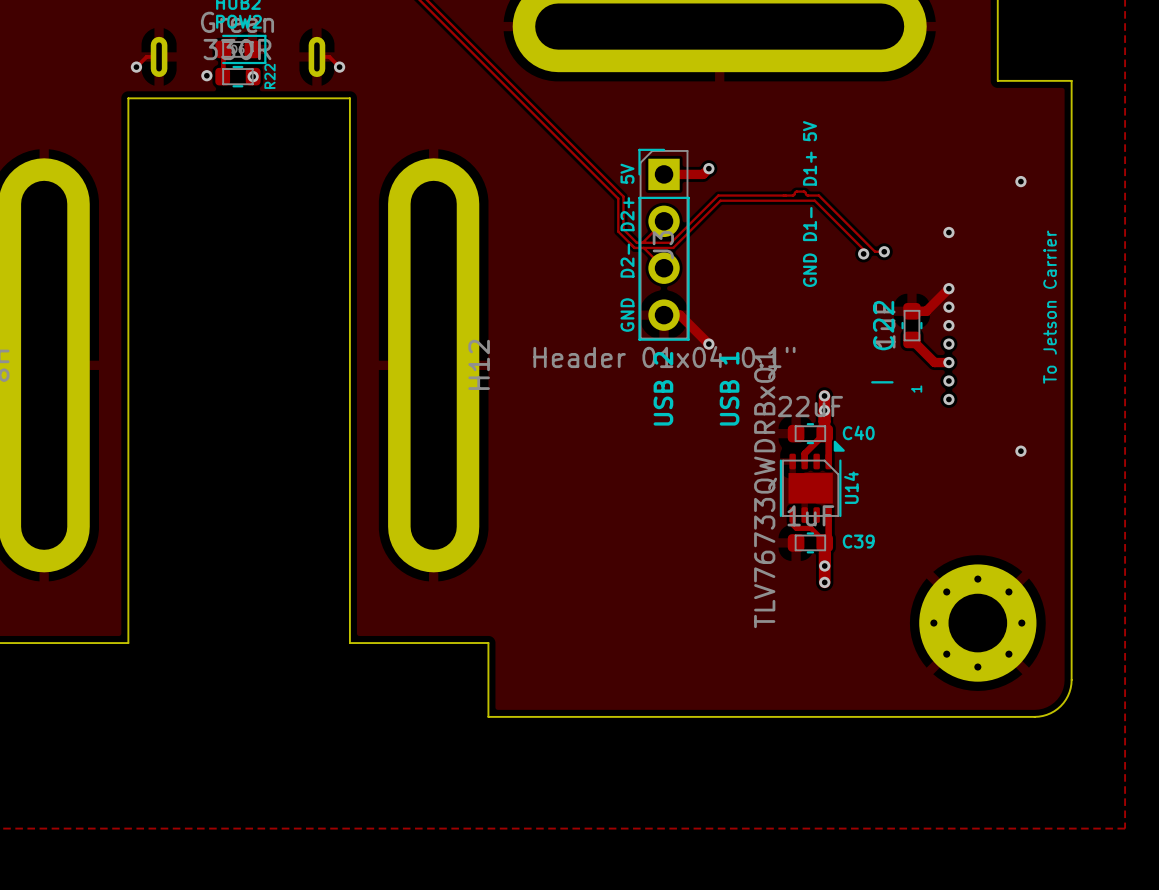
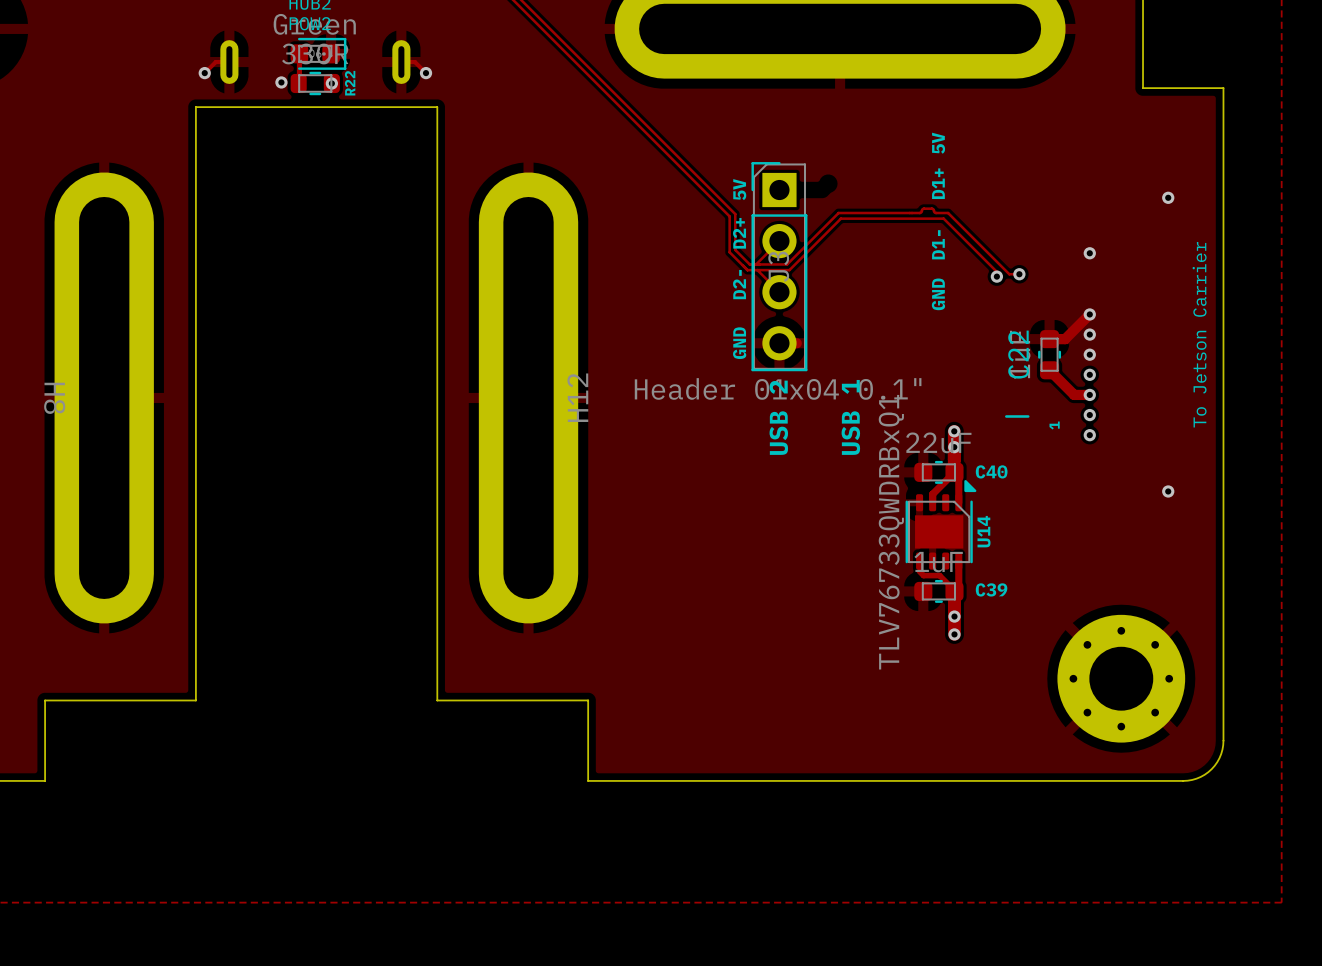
track: (708, 168) (703, 174) (664, 174) -> none
via: (708, 168) -> none
track: (679, 315) (708, 344) -> none
via: (708, 344) -> none

